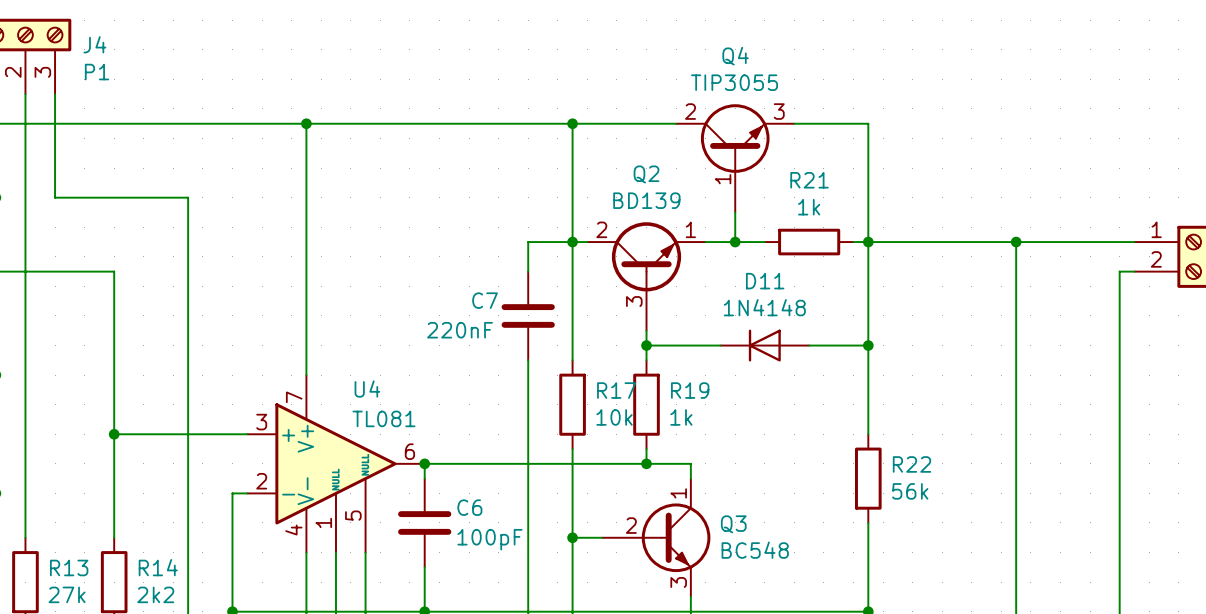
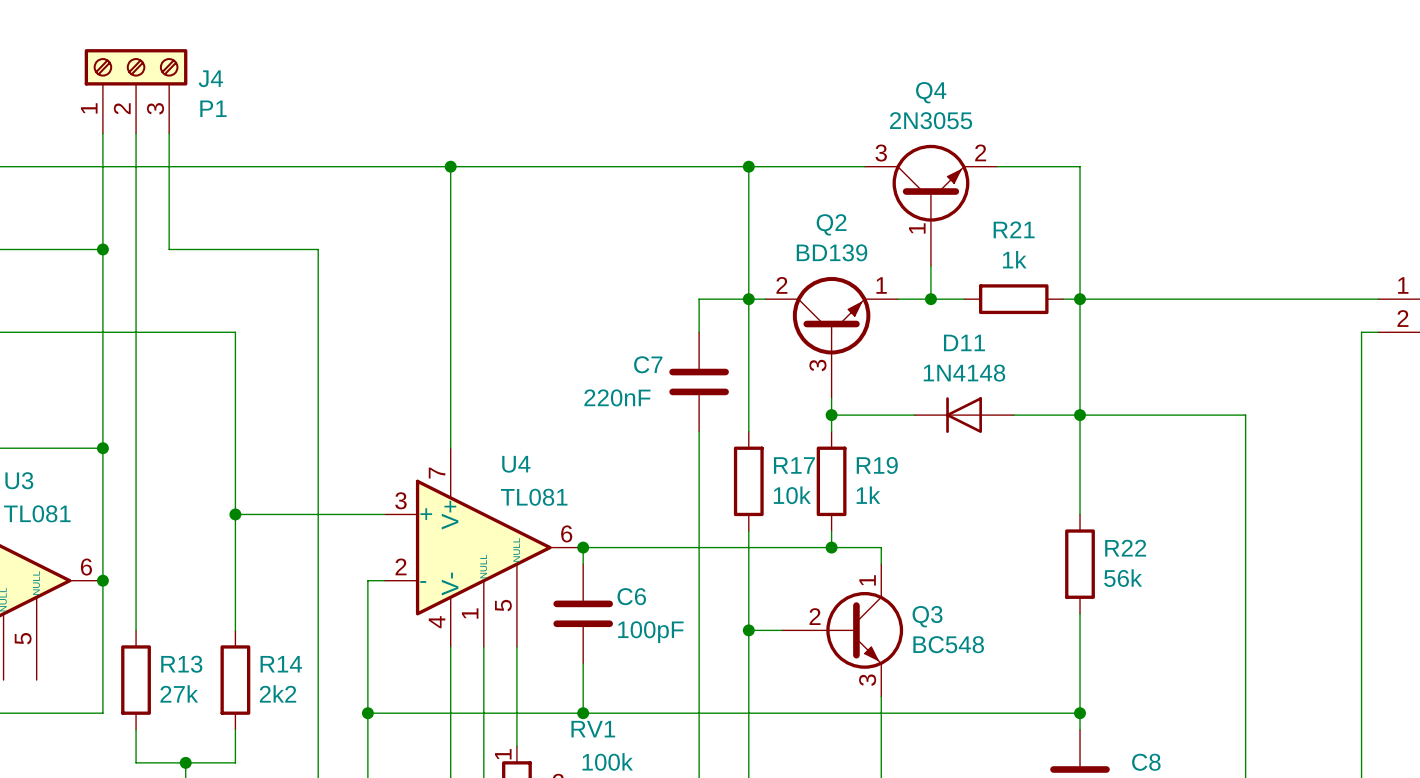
Q4 value: TIP3055 (734, 82) -> 2N3055 (931, 120)
Q4 pin number: 2 (690, 111) -> 3 (881, 153)
Q4 pin number: 3 (779, 111) -> 2 (980, 152)
wire: (1016, 242) (1016, 345) -> (1080, 415) (1245, 415)
junction: (1016, 242) -> none

